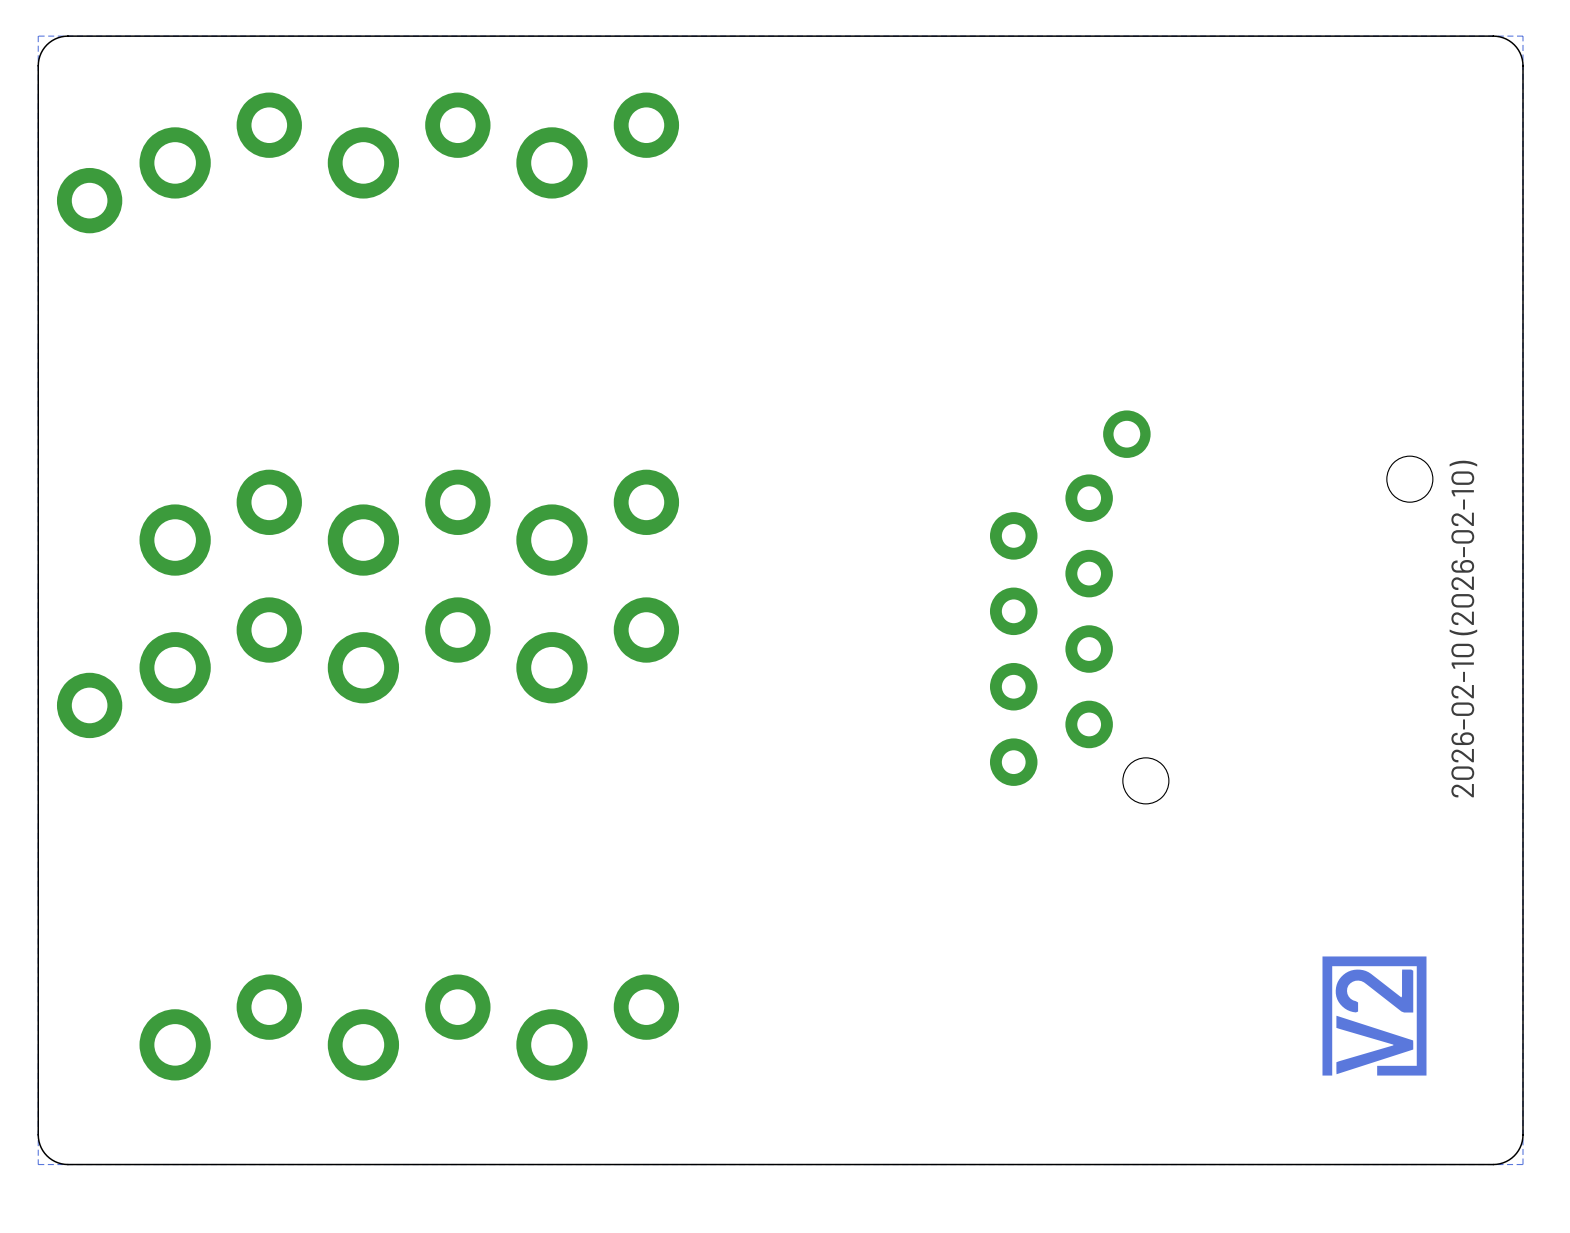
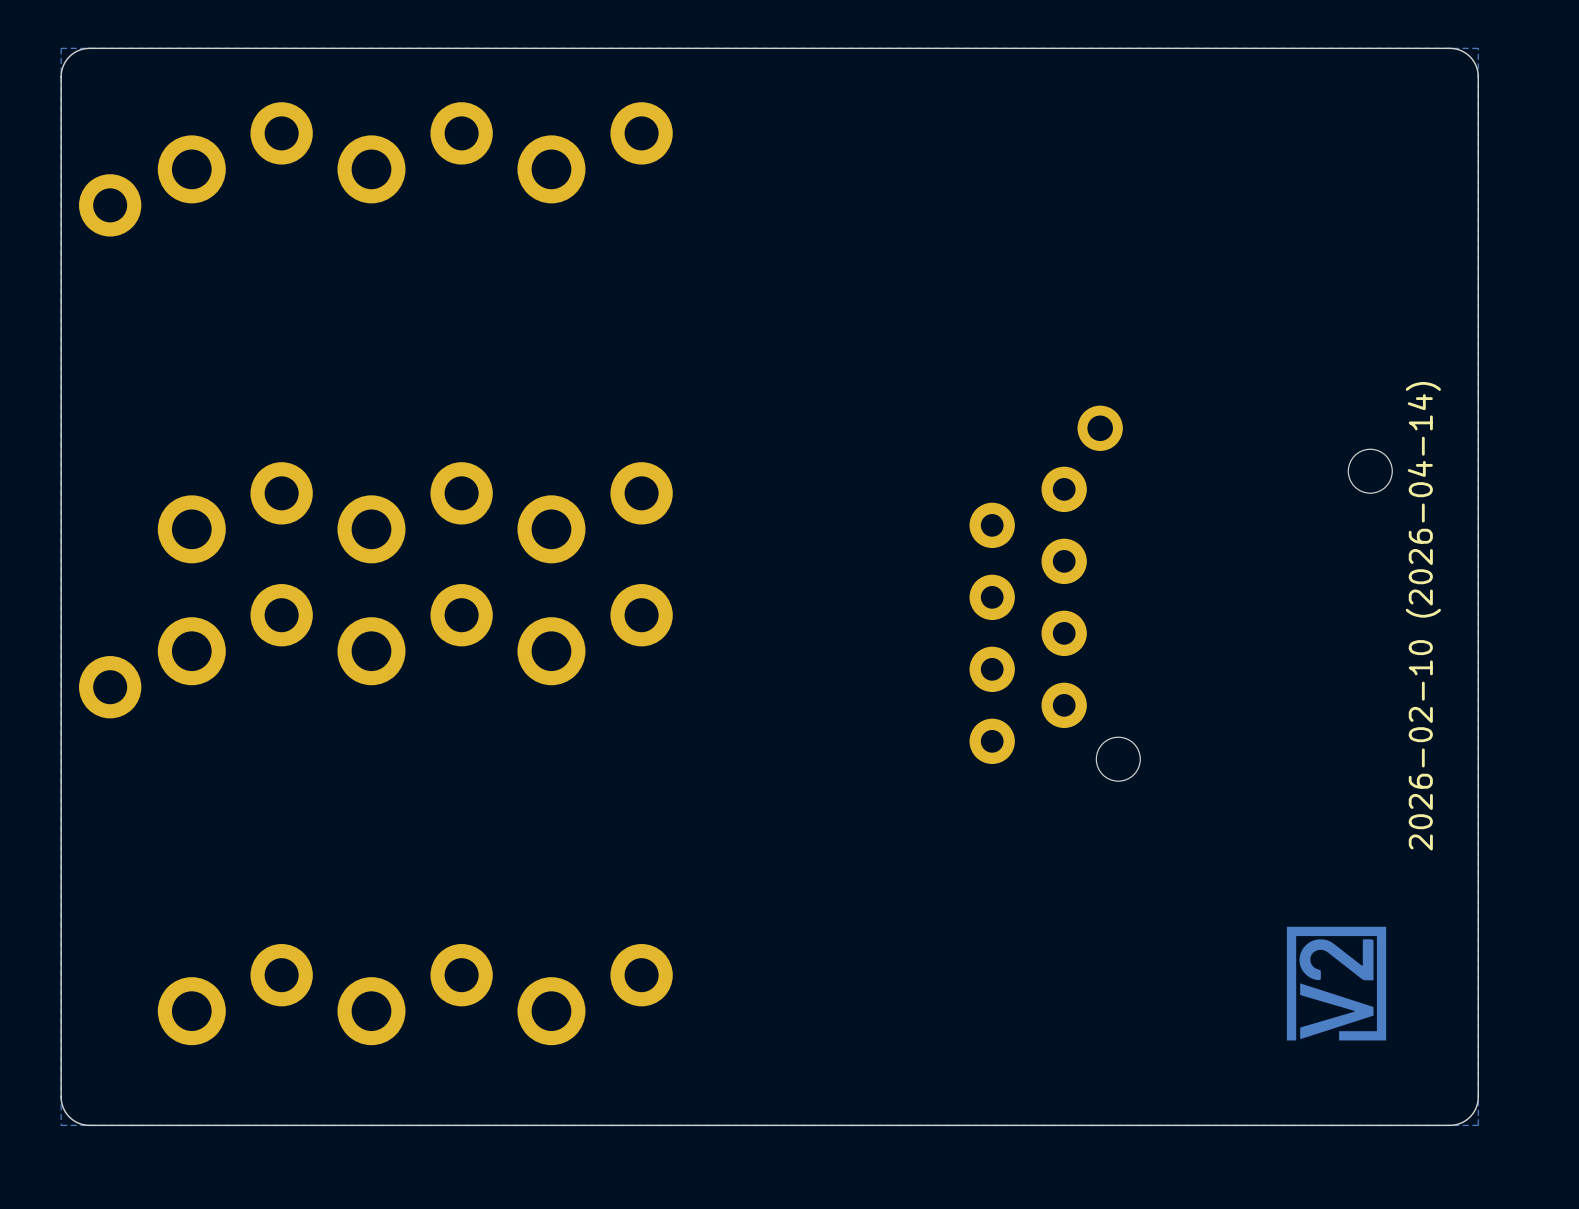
drawing shape: [1449, 460, 1478, 798] -> [1405, 381, 1441, 851]

